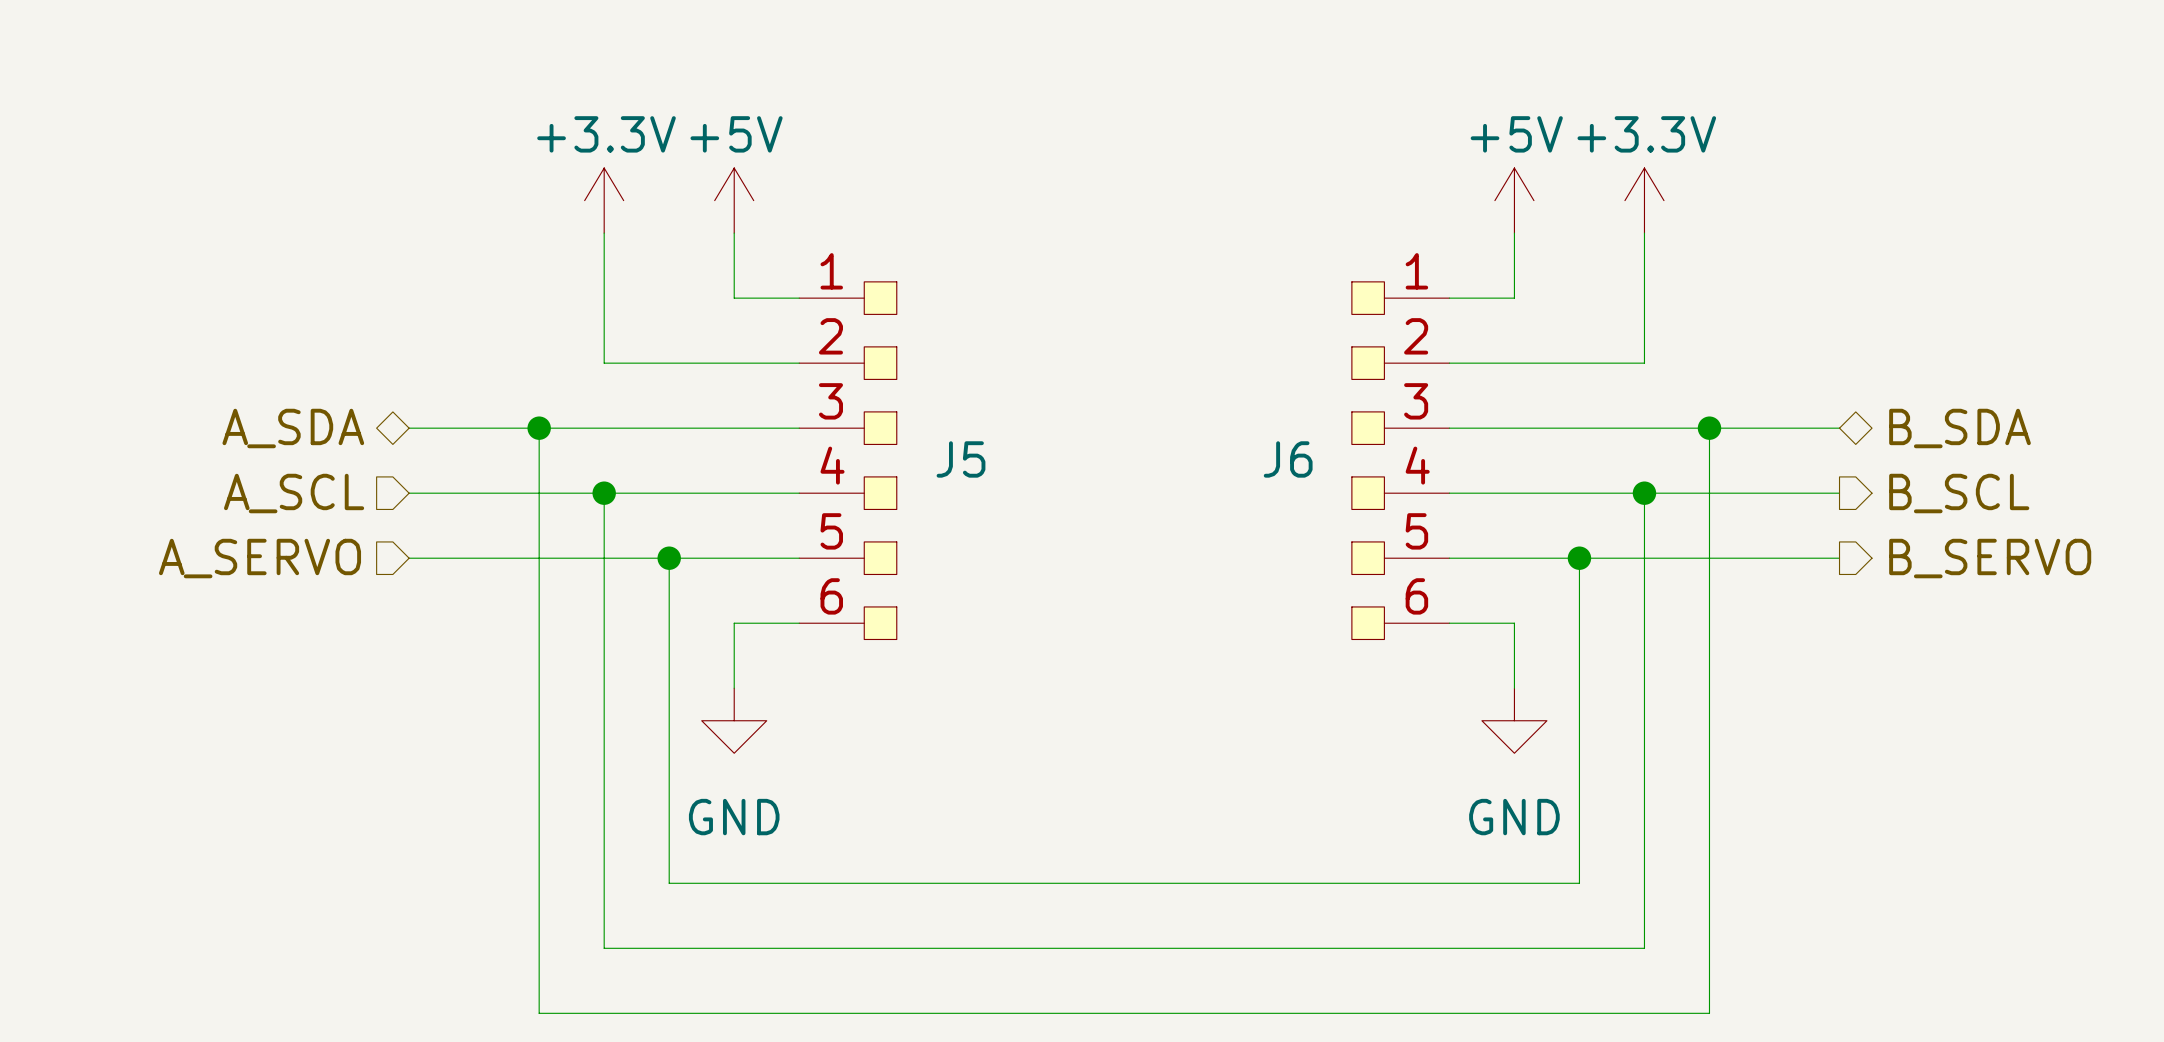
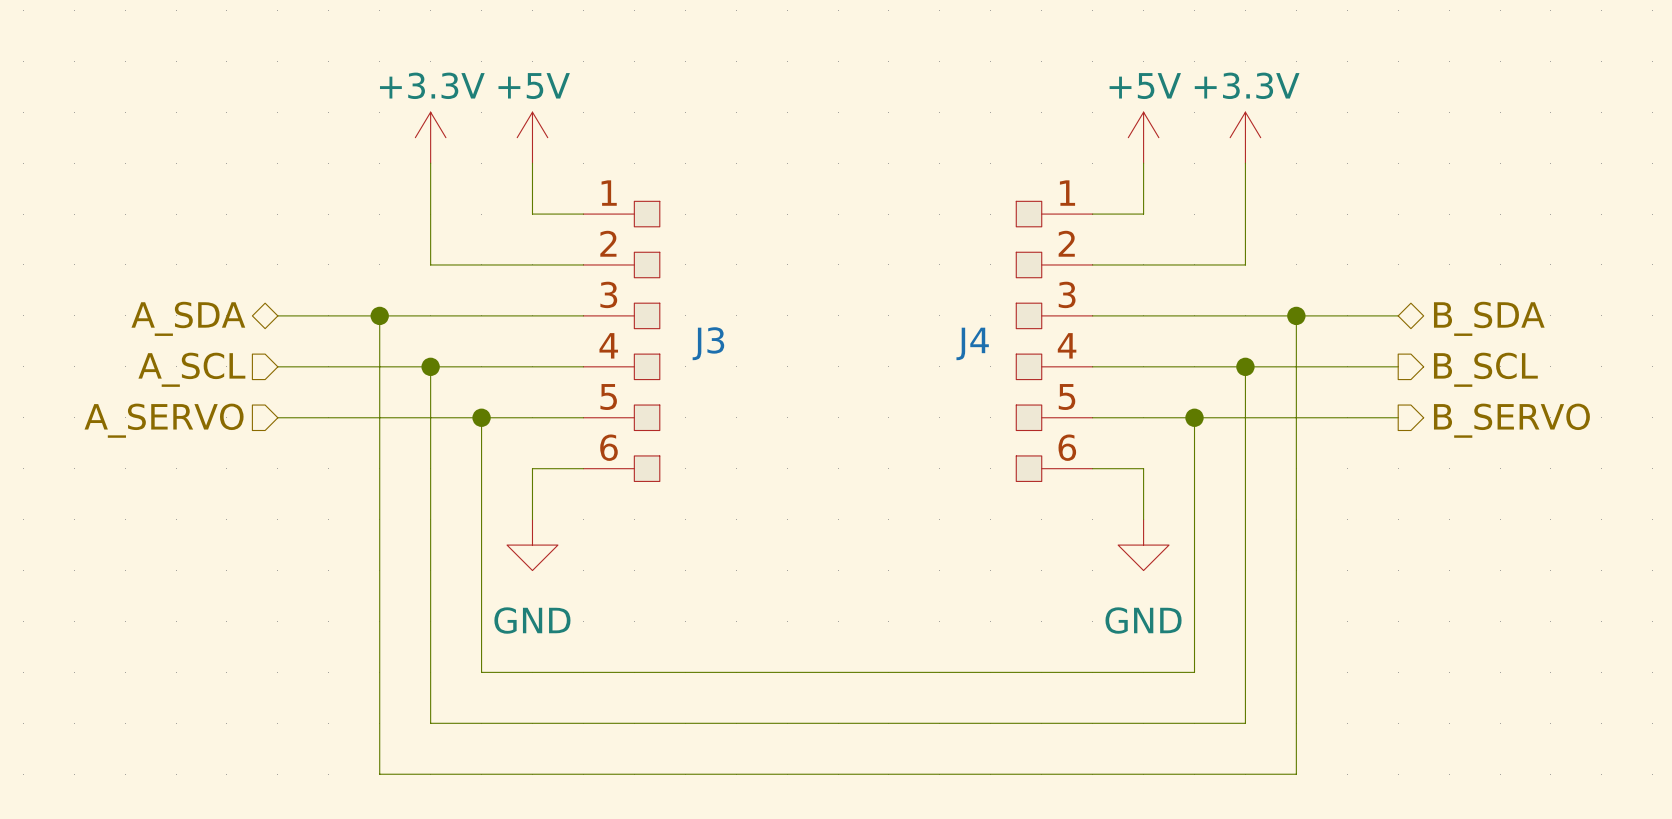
J5 name: J5 (961, 459) -> J3 (708, 343)
J6 name: J6 (1288, 459) -> J4 (972, 343)

